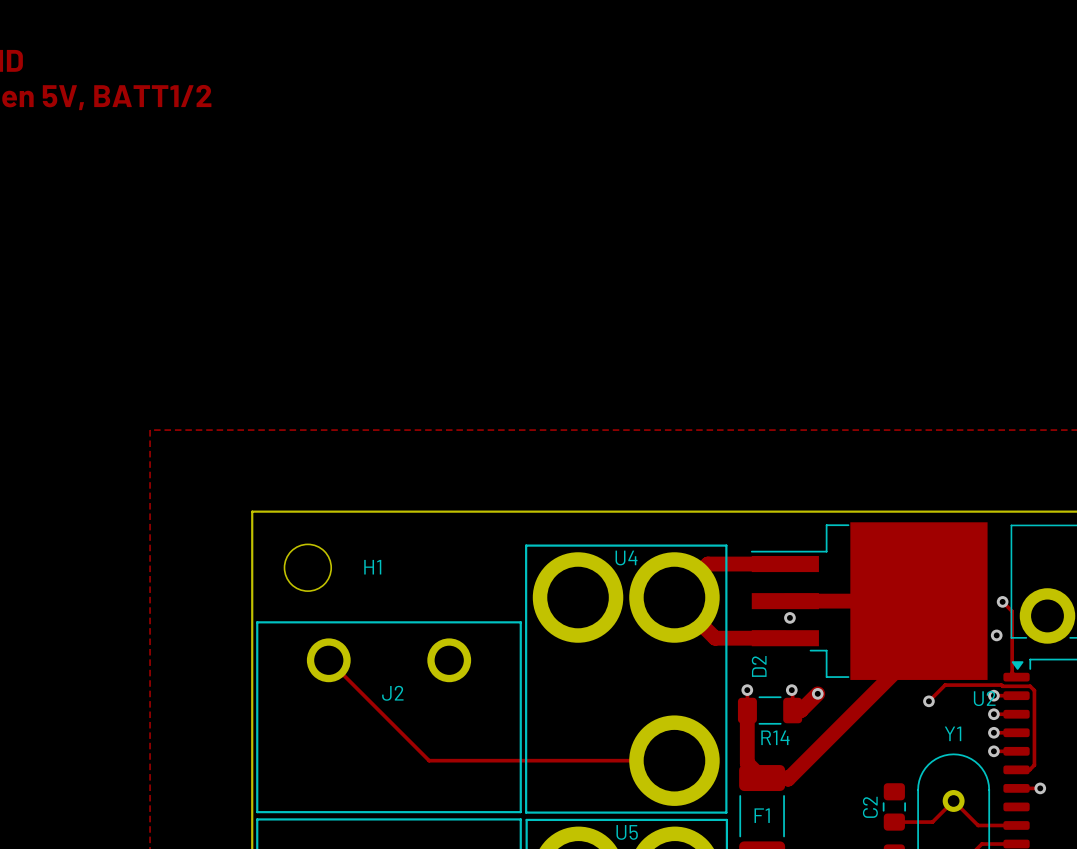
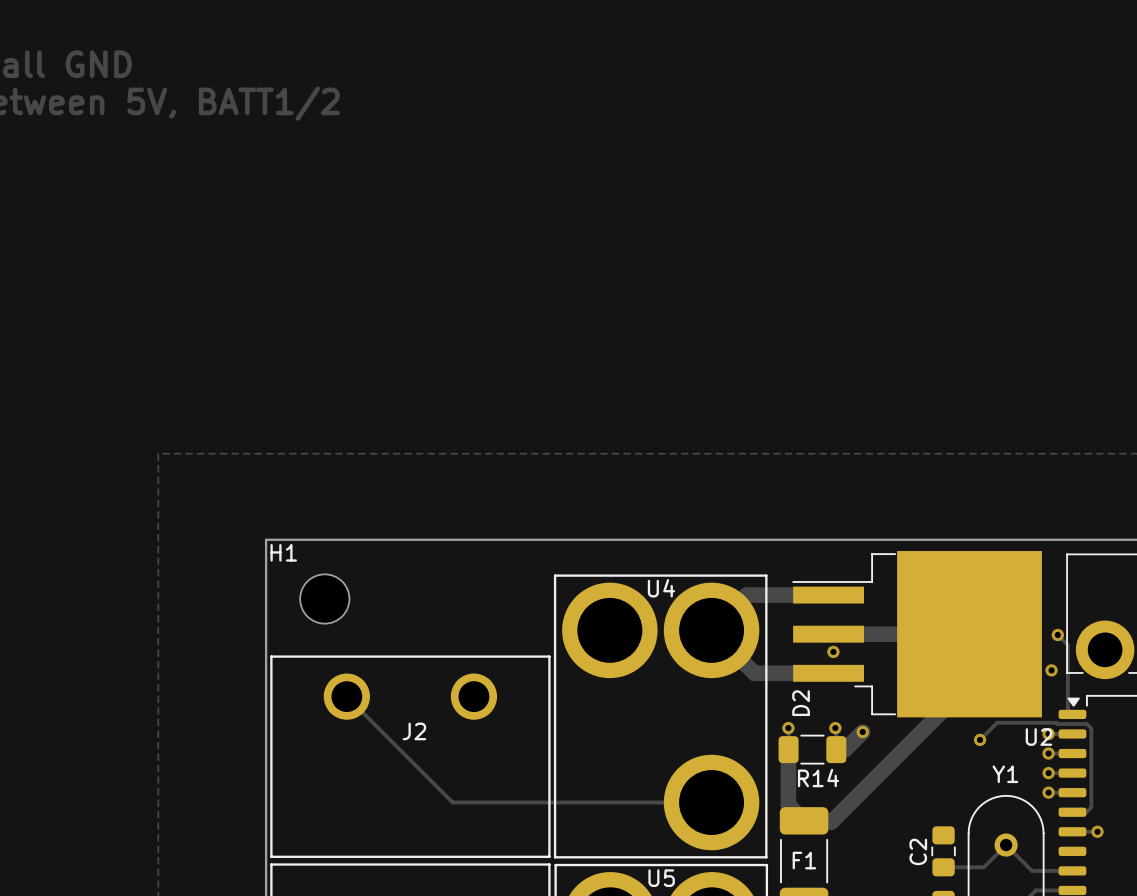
H1 name position: H1 (372, 567) -> H1 (283, 552)

